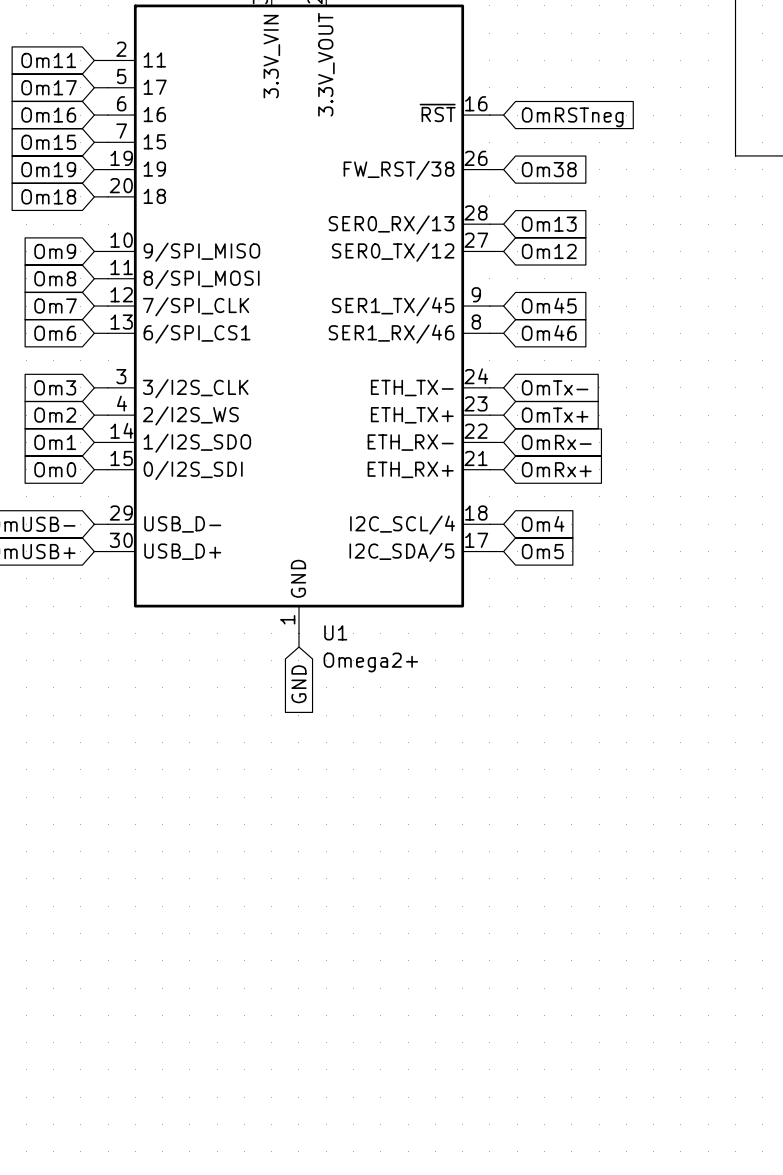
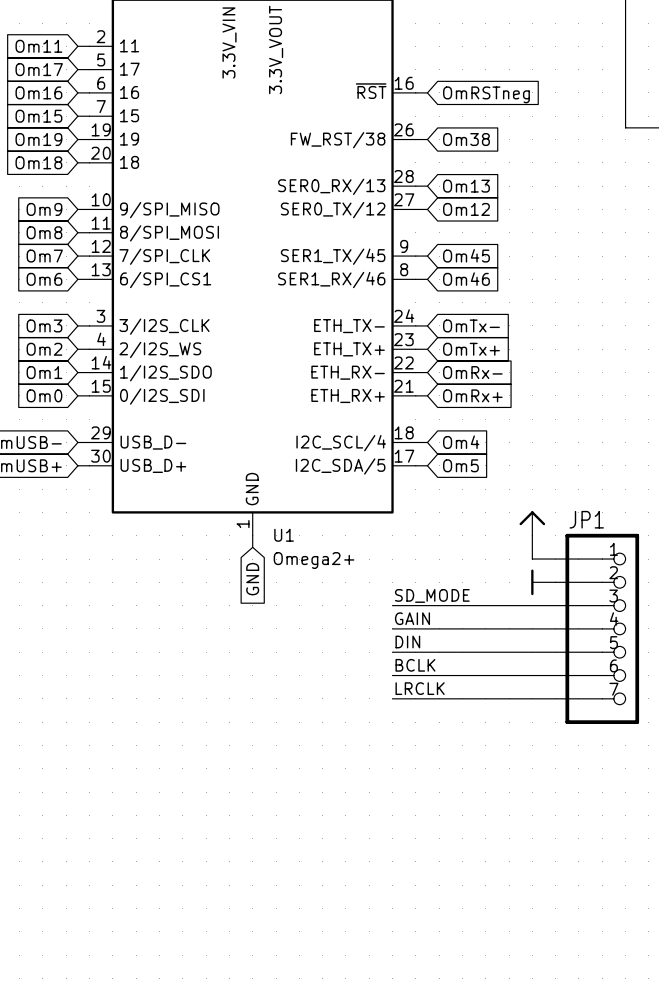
power symbol: none -> (532, 523)
wire: none -> (532, 535) (532, 559) (602, 559)
power symbol: none -> (543, 582)
wire: none -> (555, 582) (602, 582)
label: none -> SD_MODE (432, 595)
wire: none -> (392, 605) (602, 605)
label: none -> GAIN (412, 618)
wire: none -> (392, 628) (602, 628)
JP1: none -> (602, 628)
label: none -> DIN (407, 642)
wire: none -> (392, 652) (602, 652)
label: none -> BCLK (415, 665)
wire: none -> (392, 675) (602, 675)
label: none -> LRCLK (420, 688)
wire: none -> (392, 698) (602, 698)

